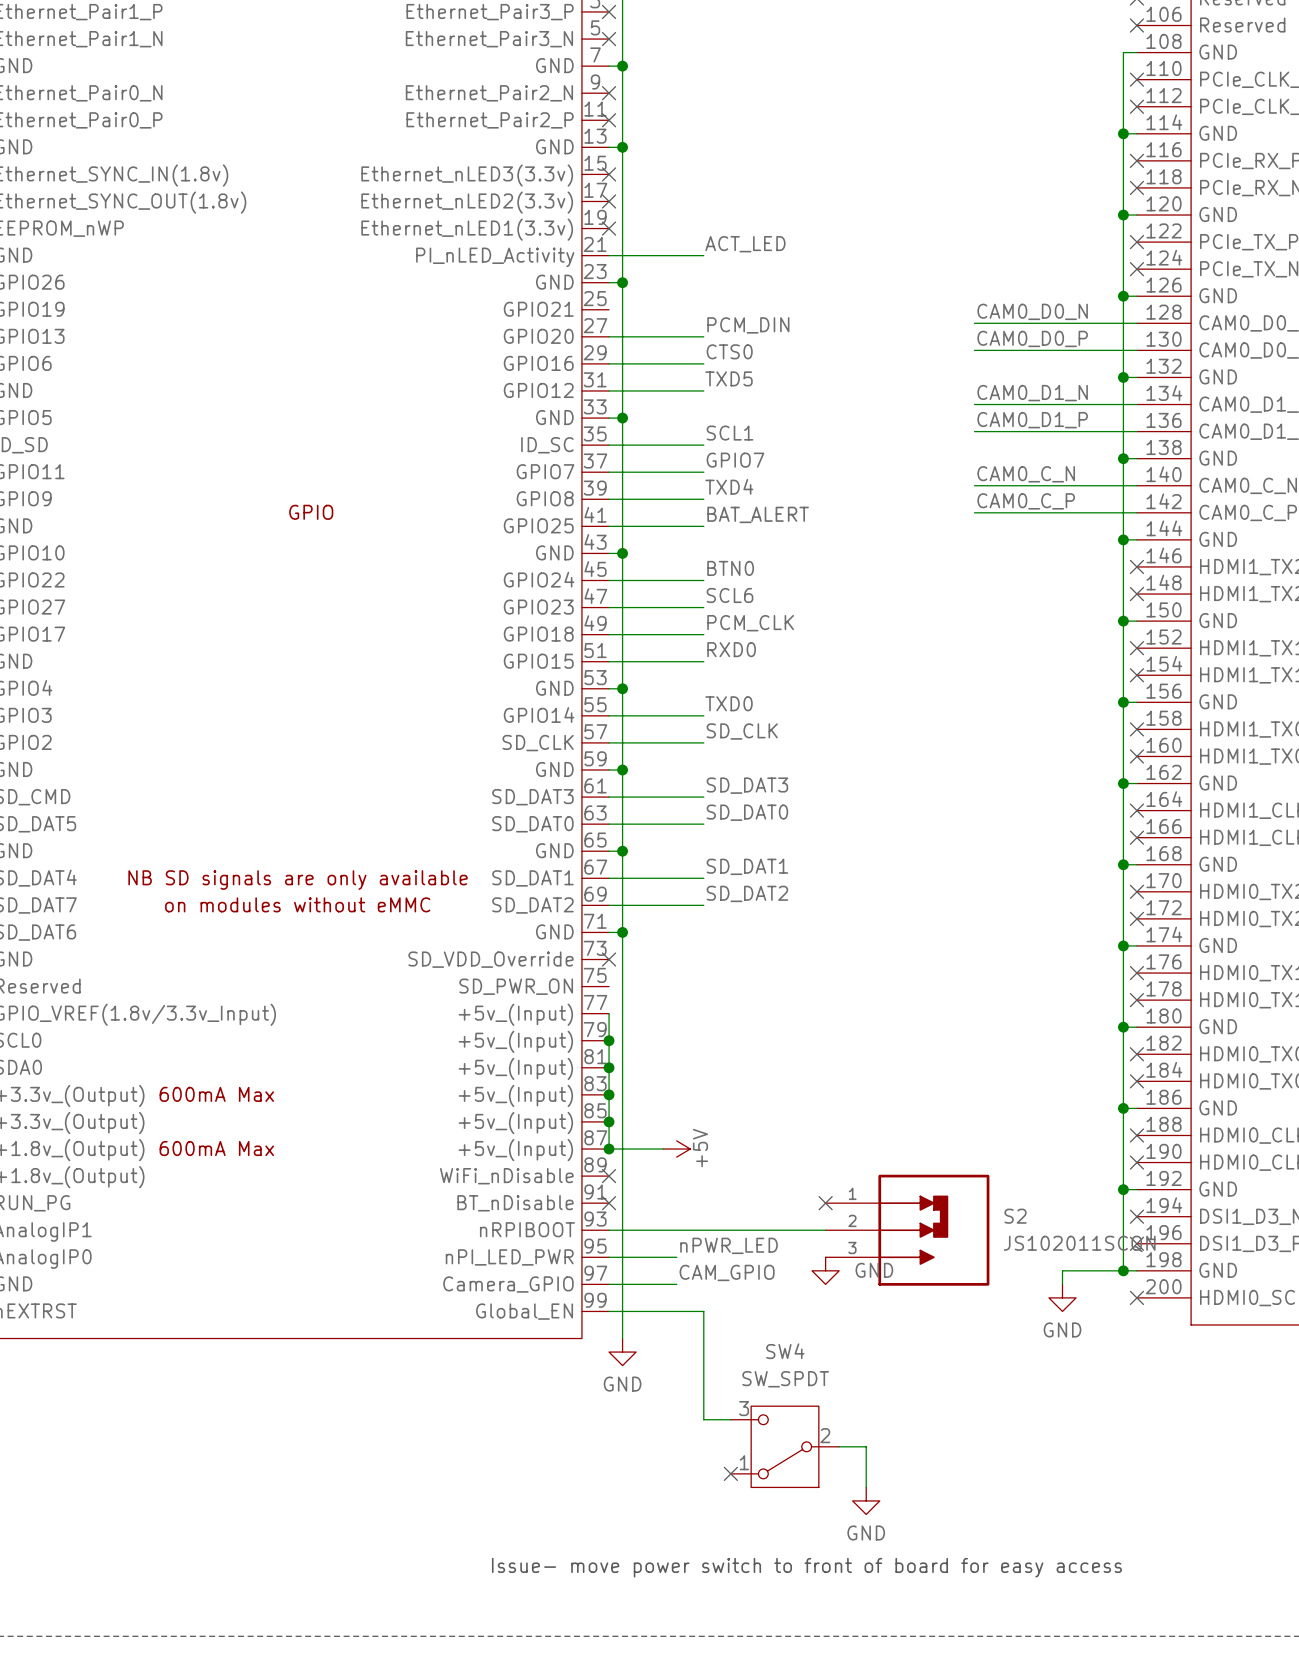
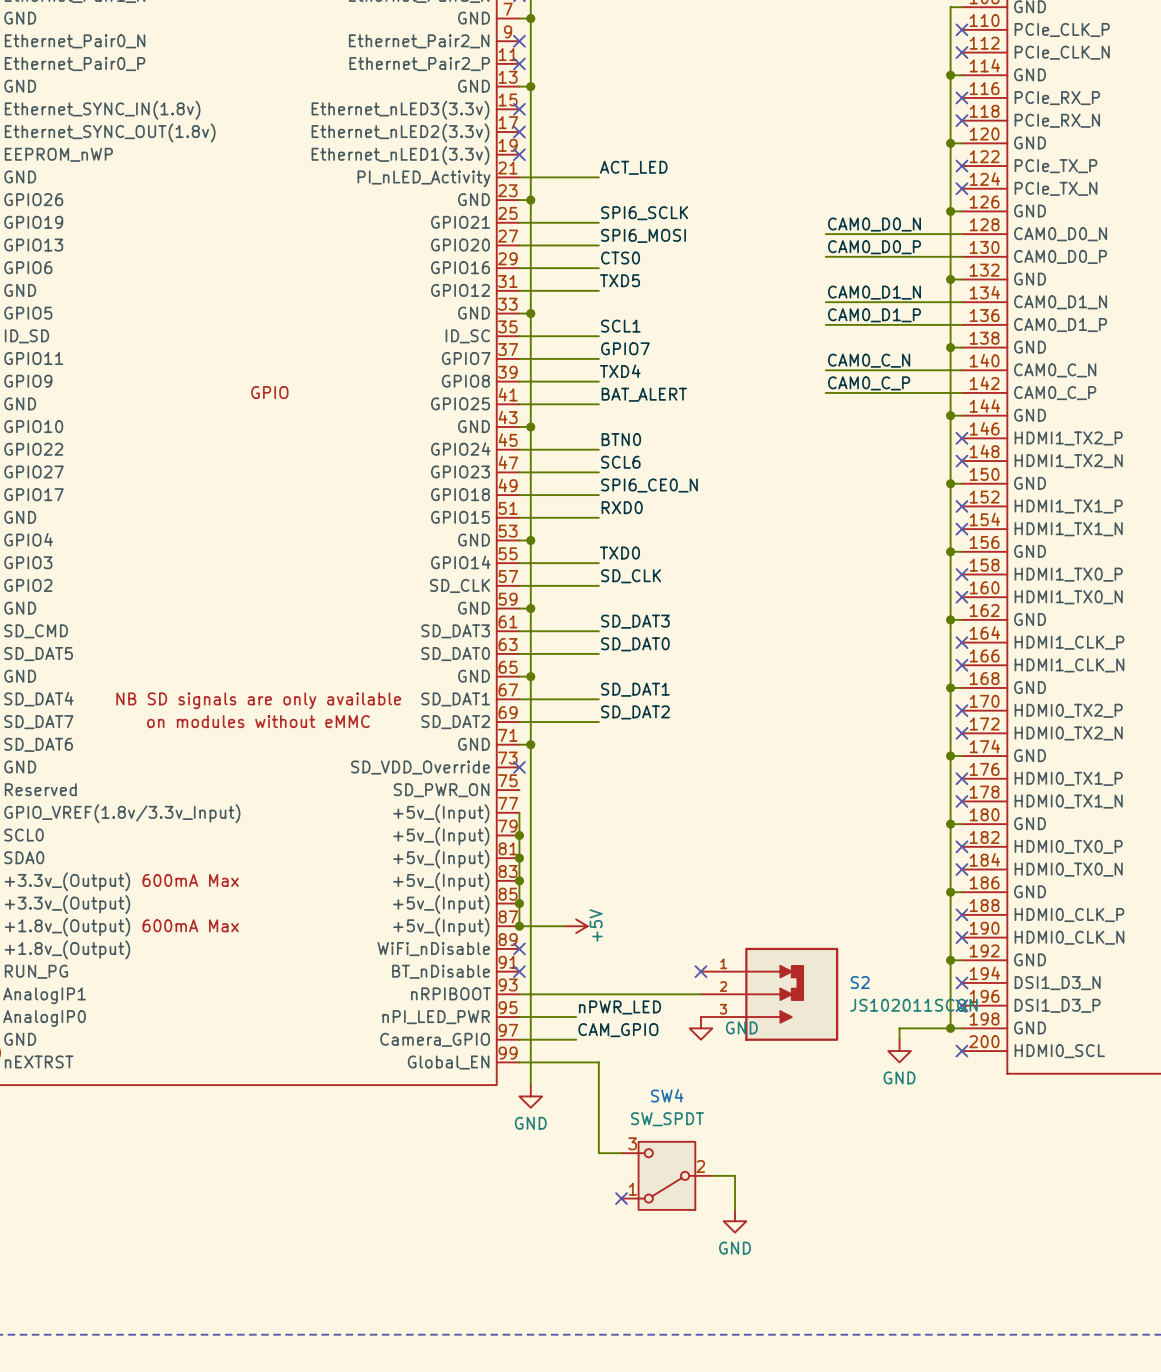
label: none -> SPI6_SCLK (644, 213)
wire: none -> (519, 222) (598, 222)
label: PCM_DIN (748, 325) -> SPI6_MOSI (643, 235)
label: PCM_CLK (750, 623) -> SPI6_CE0_N (649, 485)
text: Issue- move power switch to front of board for easy access (806, 1567) -> none

